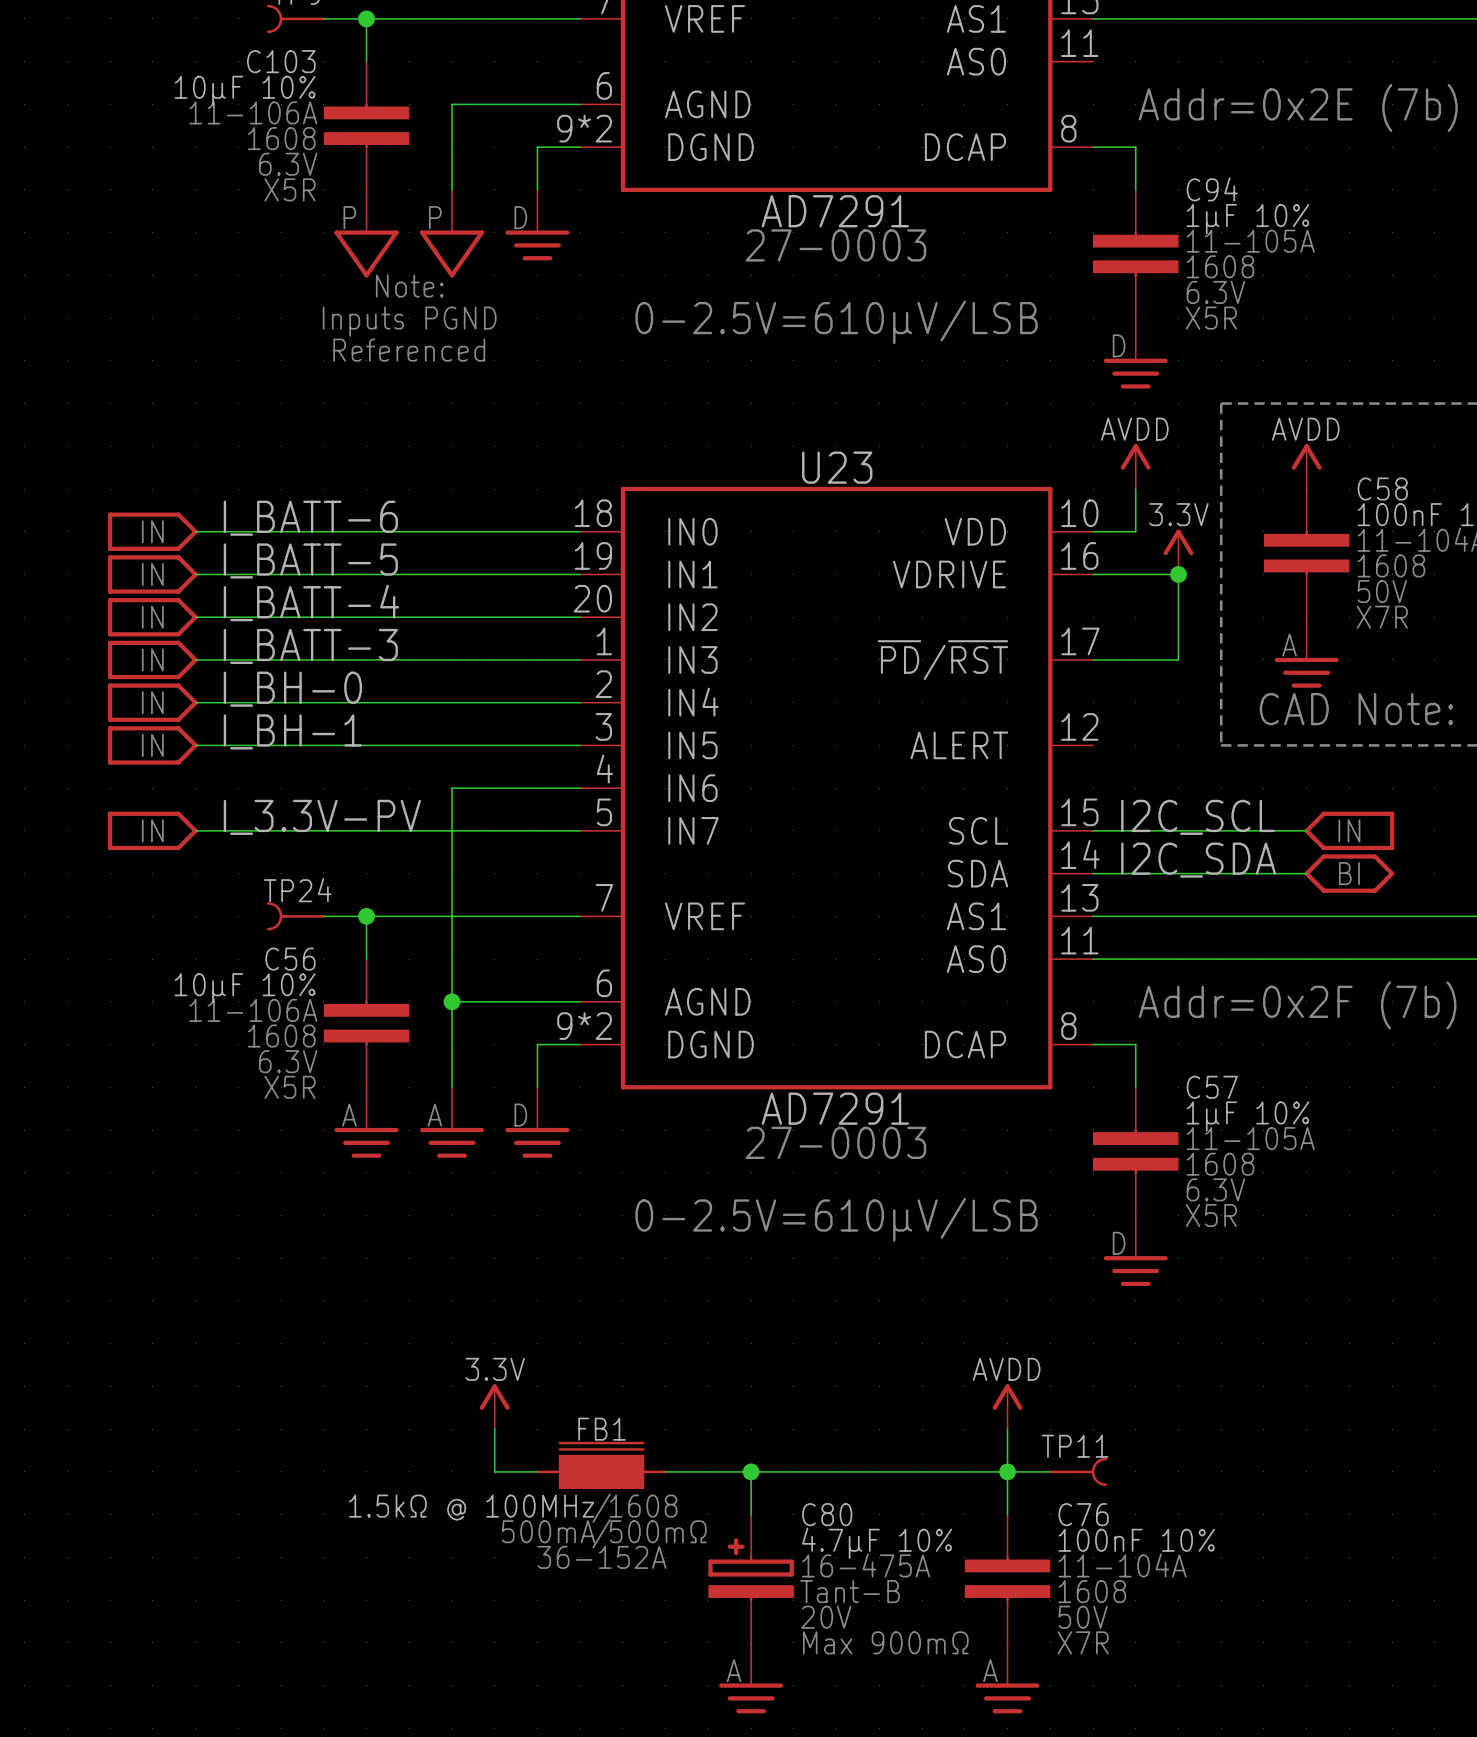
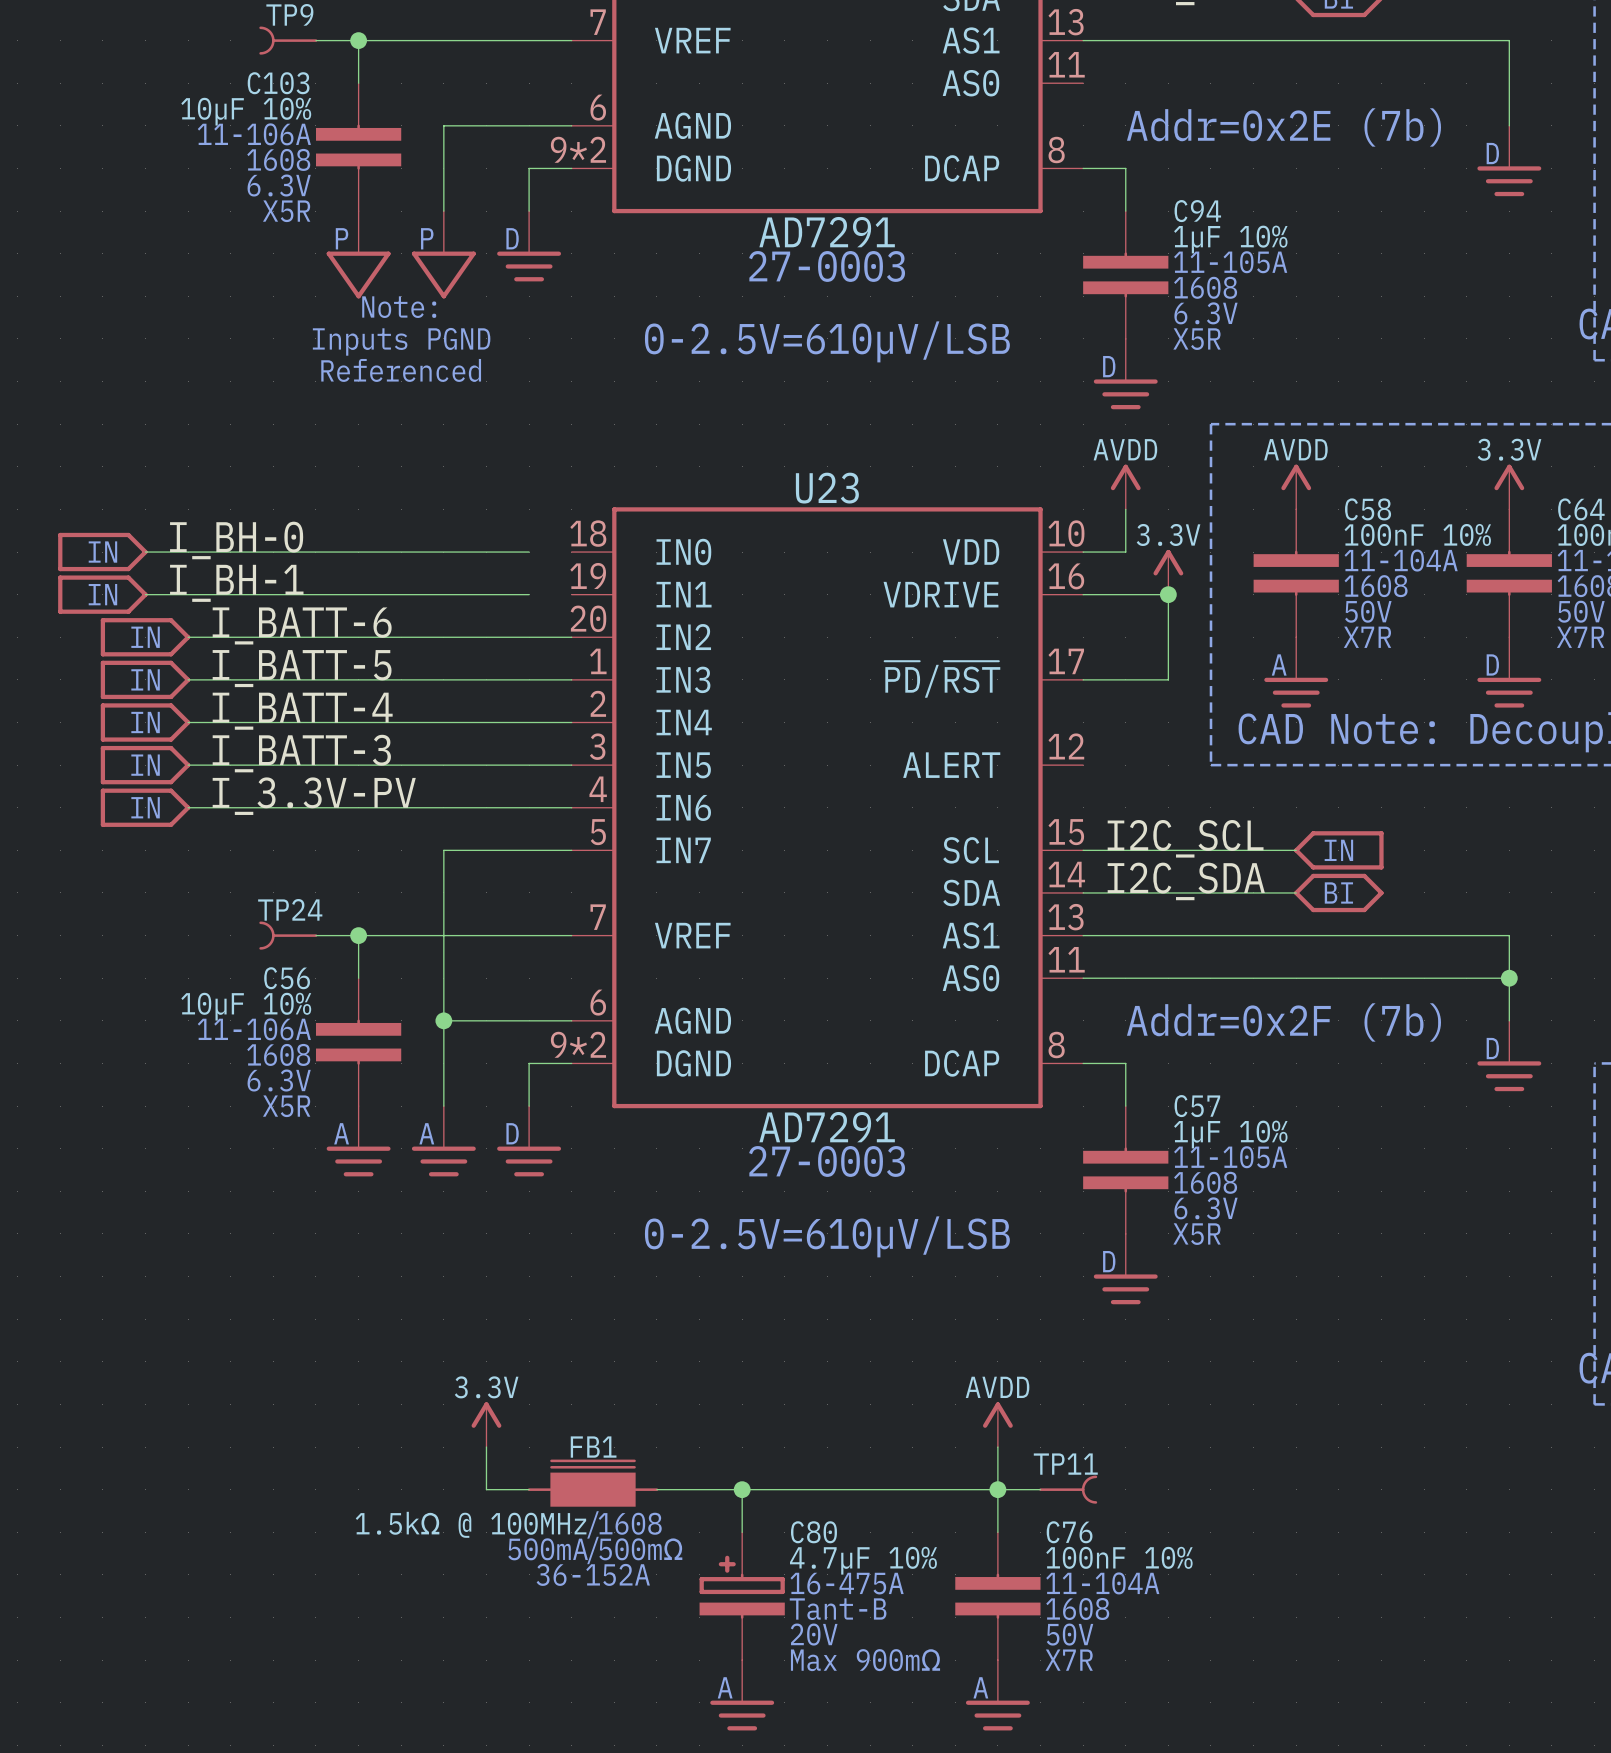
label: none -> I_BH-0 (236, 540)
label: I_BATT-6 (310, 518) -> none
part: none -> (102, 552)
part: (152, 531) -> none
wire: (537, 531) (580, 531) -> (145, 552) (188, 552)
label: none -> I_BH-1 (236, 583)
label: I_BATT-5 (310, 560) -> none
part: none -> (102, 594)
part: (152, 574) -> none
wire: (537, 574) (580, 574) -> (145, 594) (188, 594)
label: I_BATT-4 (311, 602) -> I_BATT-6 (302, 625)
label: I_BATT-3 (310, 646) -> I_BATT-5 (302, 668)
label: I_BH-0 (292, 689) -> I_BATT-4 (302, 711)
label: I_BH-1 (292, 731) -> I_BATT-3 (301, 753)
wire: (451, 788) (451, 830) (195, 830) -> (443, 807) (188, 807)
label position: I_3.3V-PV (322, 817) -> I_3.3V-PV (314, 796)
part position: (152, 830) -> (145, 807)

